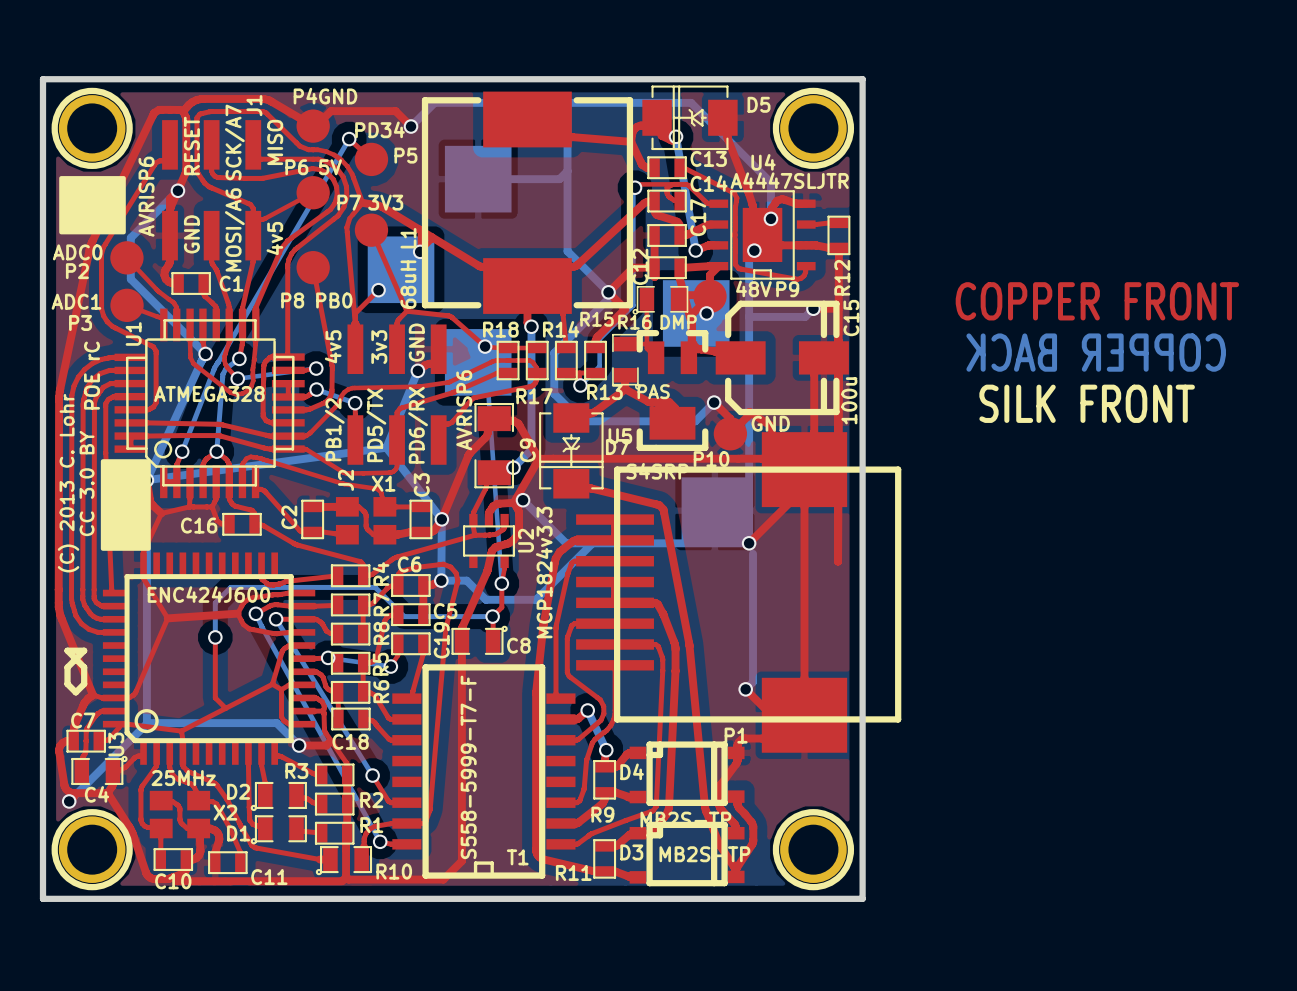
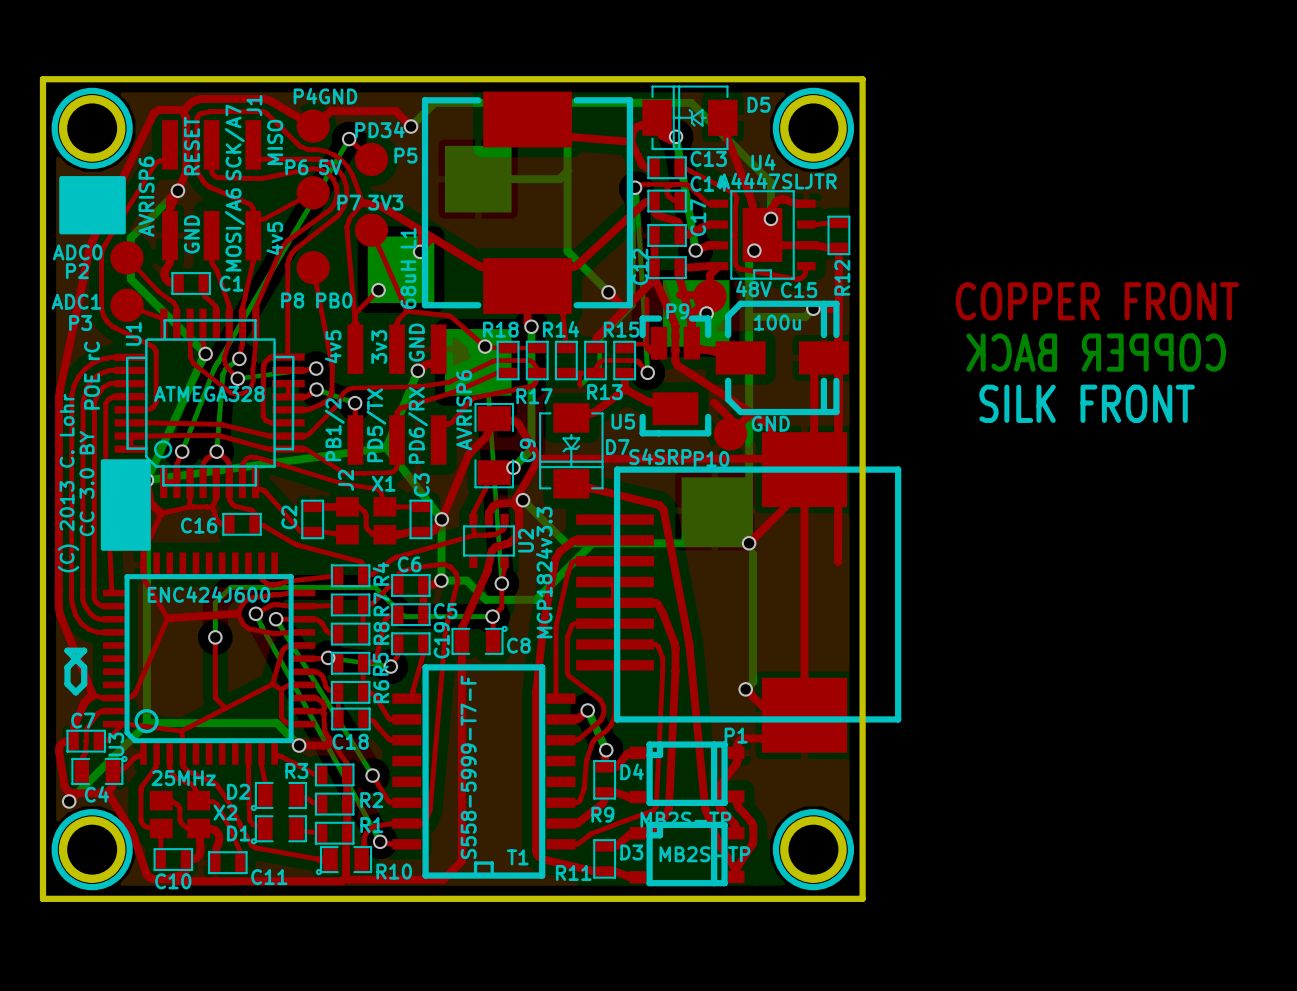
U4 value position: A4447SLJTR (789, 180) -> A4447SLJTR (777, 181)
bottom track: none -> (636, 188) (647, 372)
top track: (654, 267) (633, 267) (608, 292) -> none
top track: none -> (654, 277) (625, 308)
top track: none -> (654, 277) (675, 324) (675, 335)
P9 name position: P9 (787, 289) -> P9 (677, 311)
bottom track: (608, 292) (608, 298) (554, 353) (554, 393) (581, 421) (695, 421) (714, 402) -> none
R16: DMP (660, 300) -> none
C15 name rotation: 0° (851, 318) -> 90° clockwise (799, 290)
C15 name position: C15 (851, 318) -> C15 (799, 290)
R15 name position: R15 (597, 319) -> R15 (621, 329)
R15 footprint: [612, 333, 641, 390] -> [613, 340, 637, 381]
top track: none -> (675, 335) (675, 350)
top track: none -> (675, 350) (677, 365) (749, 411)
top track: none -> (647, 372) (635, 360) (603, 360) (596, 367) (595, 373)
via: none -> (647, 372)
via: (580, 385) -> none
U5 position: (672, 390) -> (675, 375)
R15 value: PAS (653, 391) -> none
C15 value rotation: 0° (849, 400) -> 90° clockwise (777, 322)
C15 value position: 100u (849, 400) -> 100u (777, 322)
via: (714, 402) -> none

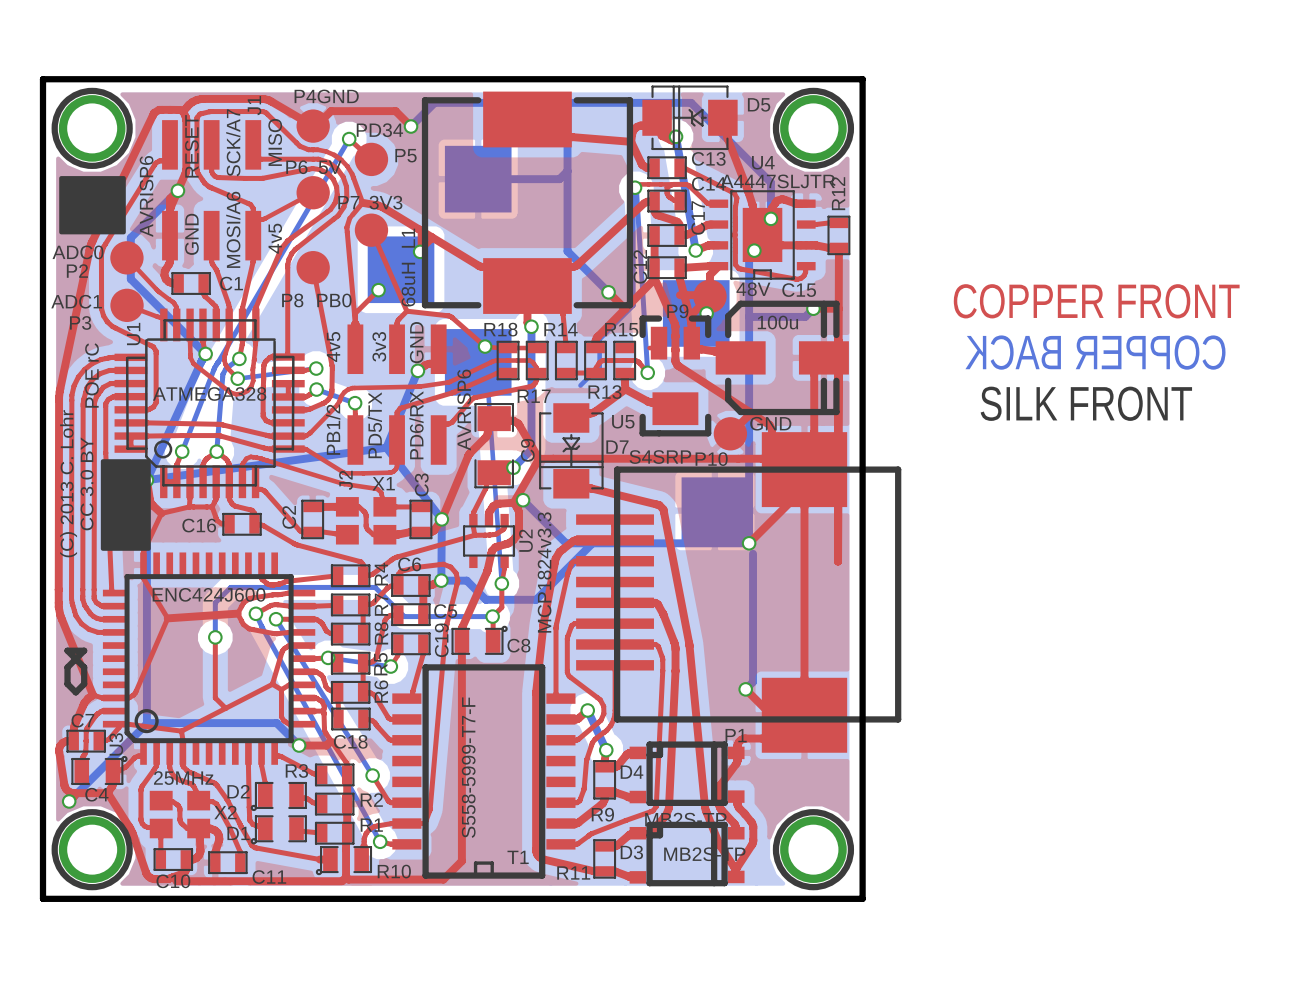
R12 name position: R12 (842, 277) -> R12 (838, 193)
top track: (646, 299) (646, 348) (656, 357) (656, 353) (646, 344) (625, 344) -> none
top track: (579, 373) (580, 385) -> none
top track: (714, 402) (730, 418) (730, 433) -> none

